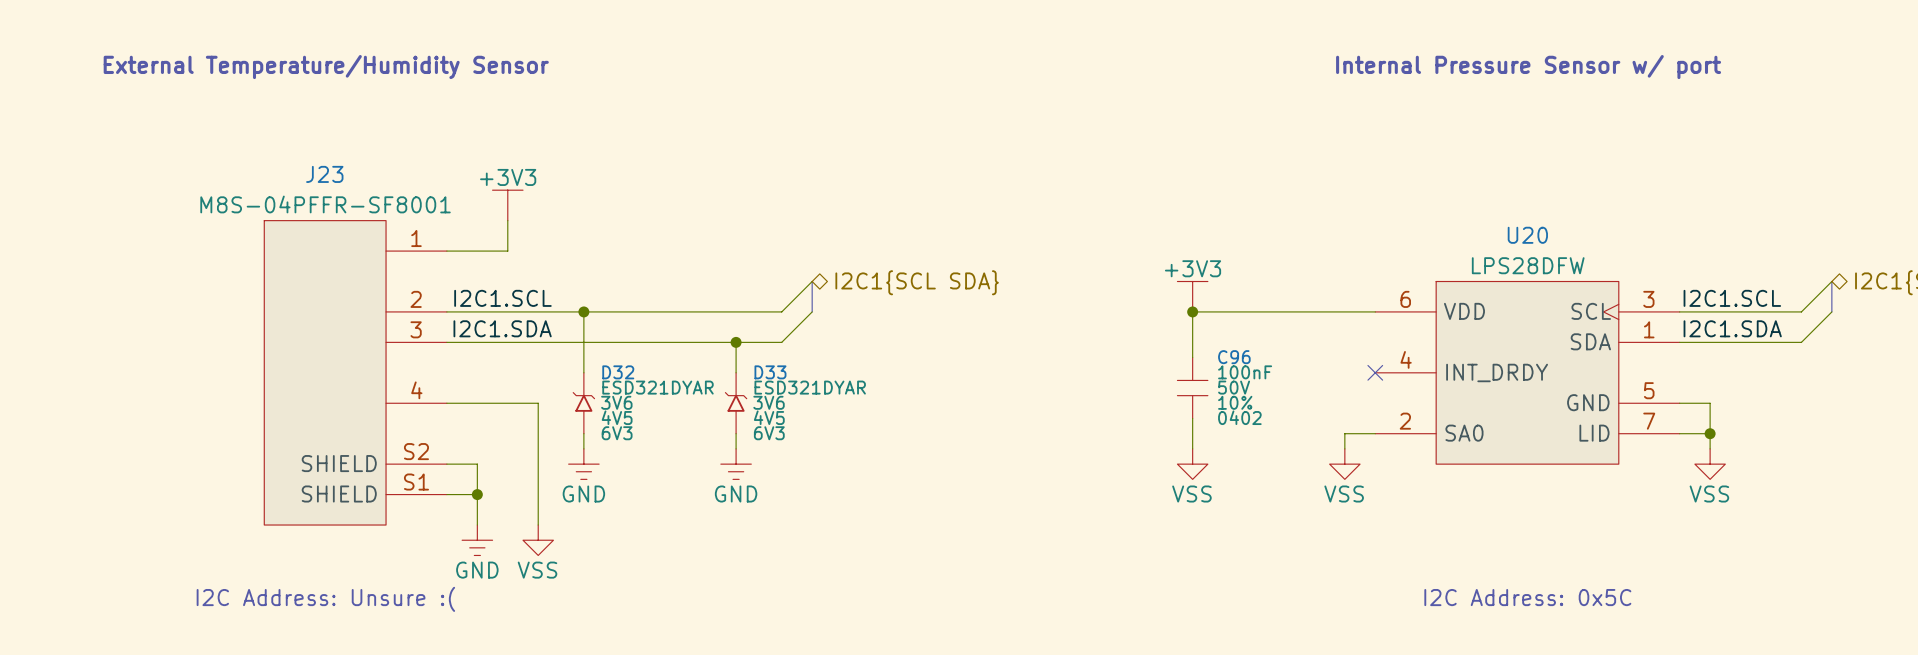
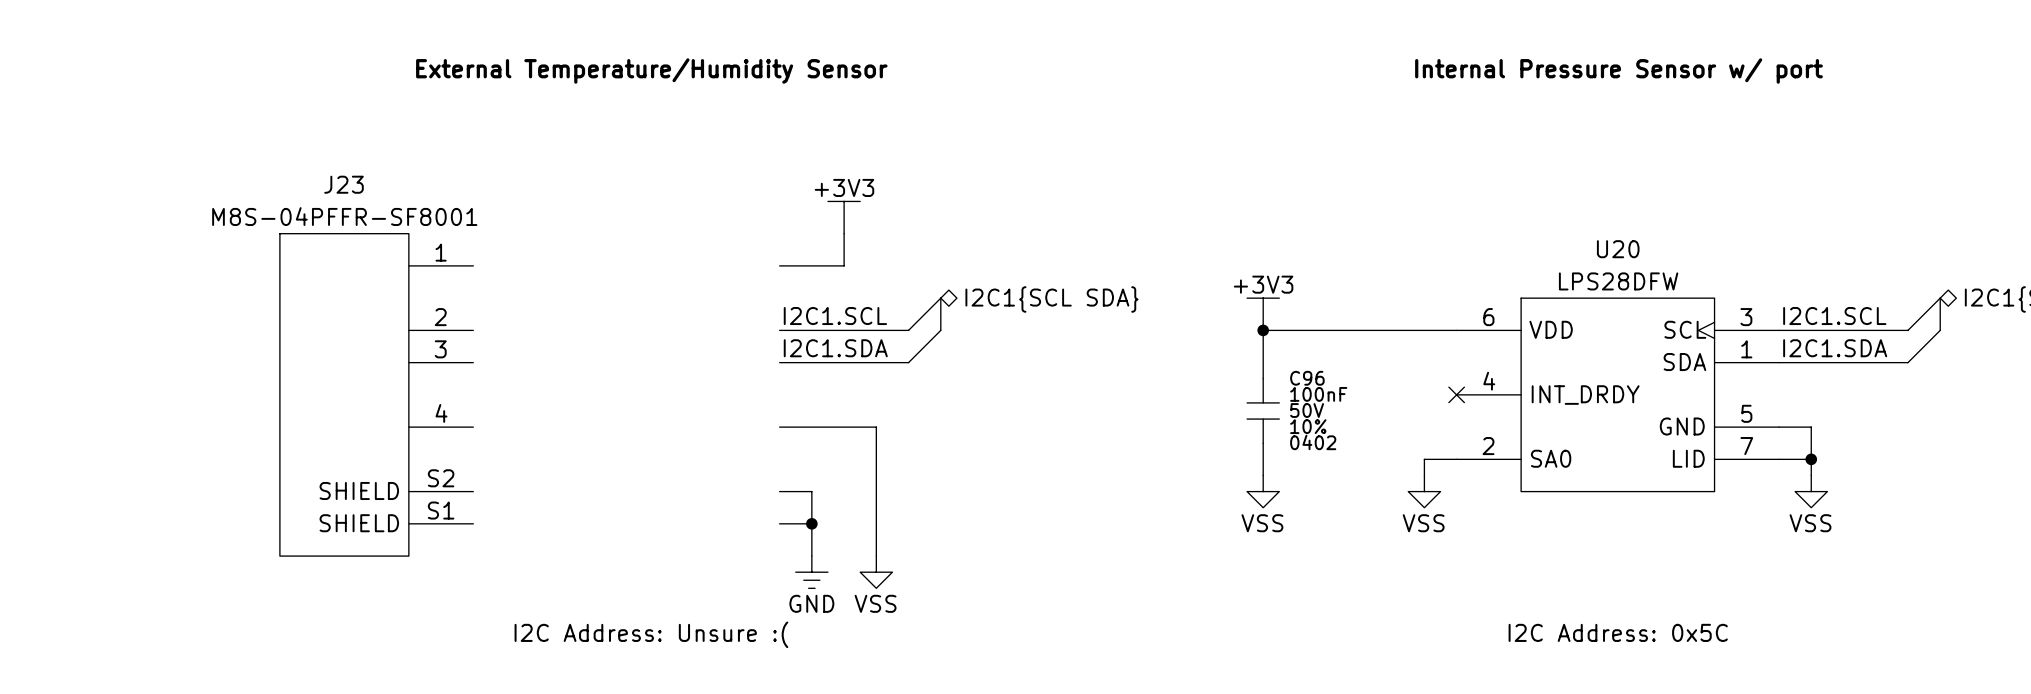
text position: External Temperature/Humidity Sensor (326, 67) -> External Temperature/Humidity Sensor (651, 71)
power symbol position: +3V3 (507, 205) -> +3V3 (844, 217)
wire: (507, 220) (507, 251) (446, 251) -> (844, 233) (844, 265) (779, 265)
wire: (812, 281) (781, 311) -> (940, 298) (908, 330) (827, 330)
bus: (812, 281) (812, 311) -> (940, 298) (940, 330)
hierarchical label position: I2C1{SCL SDA} (917, 282) -> I2C1{SCL SDA} (1051, 299)
label position: I2C1.SCL (502, 298) -> I2C1.SCL (835, 316)
wire: (446, 311) (736, 311) -> none
wire: (583, 311) (583, 372) -> none
junction: (583, 311) -> none
wire: (812, 311) (781, 342) -> (940, 330) (908, 362) (827, 362)
label position: I2C1.SDA (502, 328) -> I2C1.SDA (835, 348)
wire: (446, 342) (736, 342) (736, 372) -> none
junction: (736, 342) -> none
wire: (446, 403) (538, 403) (538, 525) -> (779, 427) (876, 427) (876, 556)
D32: ESD321DYAR (583, 403) -> none
D33: ESD321DYAR (736, 403) -> none
wire: (583, 433) (583, 448) -> none
wire: (736, 433) (736, 448) -> none
wire: (446, 464) (477, 464) (477, 525) -> (779, 491) (811, 491) (811, 556)
power symbol: GND (583, 464) -> none
power symbol position: GND (736, 464) -> GND (811, 572)
wire: (446, 494) (477, 494) -> (779, 523) (811, 523)
junction: (477, 494) -> none
junction: none -> (811, 523)
power symbol: GND (477, 540) -> none
power symbol position: VSS (538, 540) -> VSS (876, 572)
text position: I2C Address: Unsure :( (325, 599) -> I2C Address: Unsure :( (651, 634)

